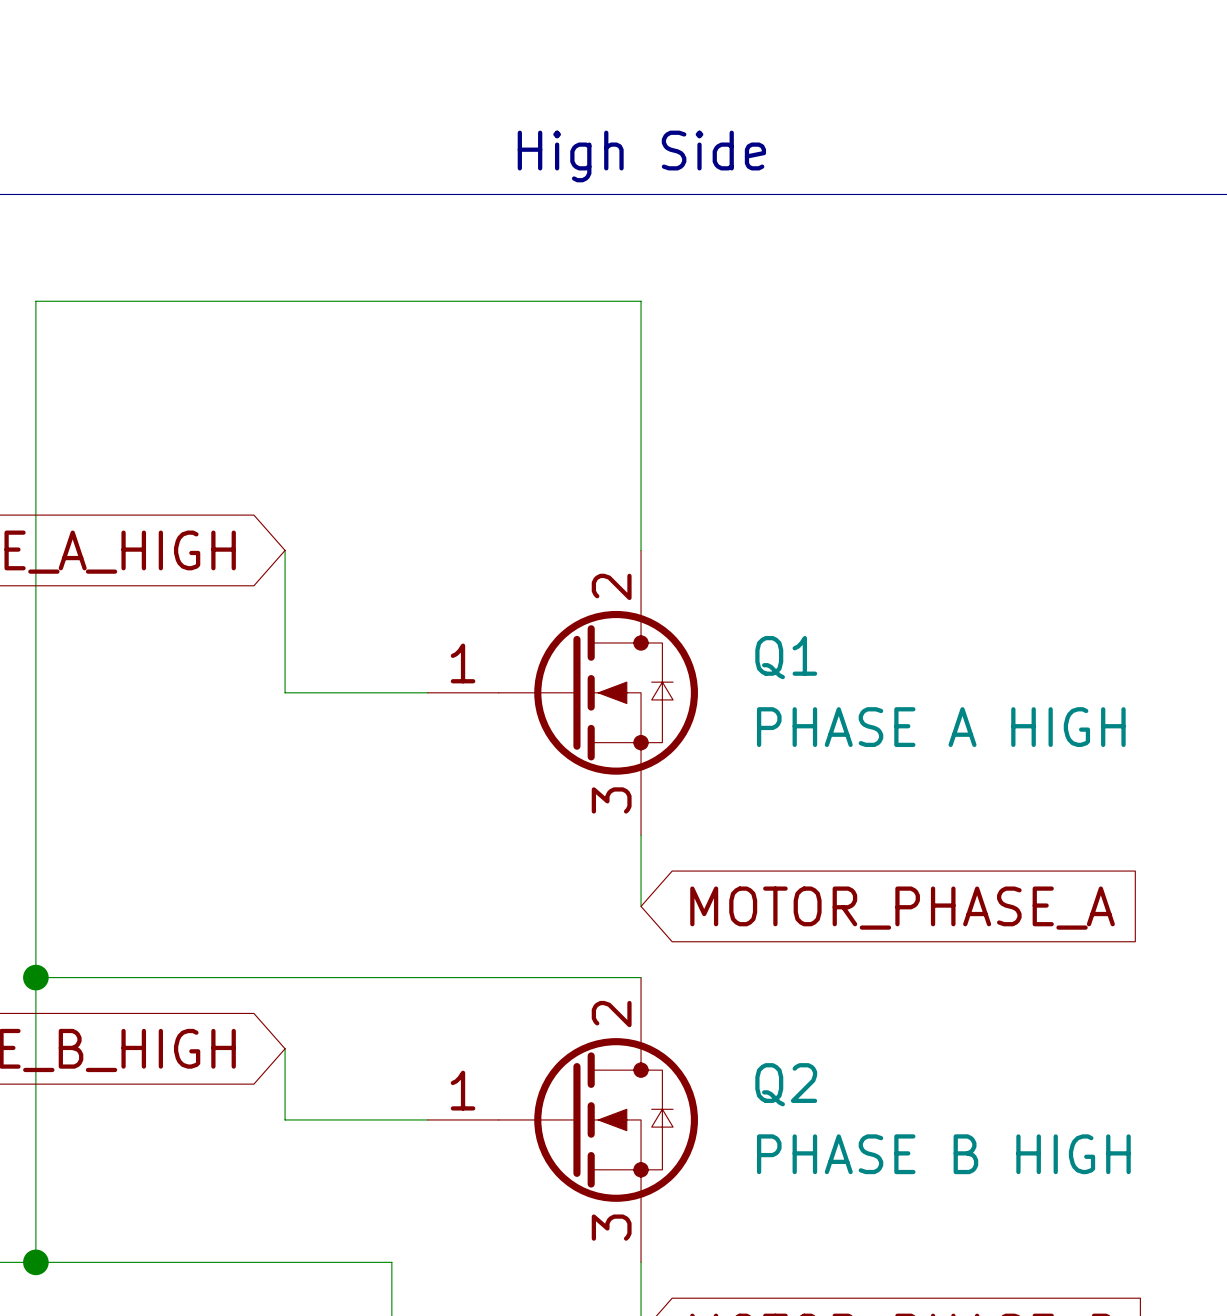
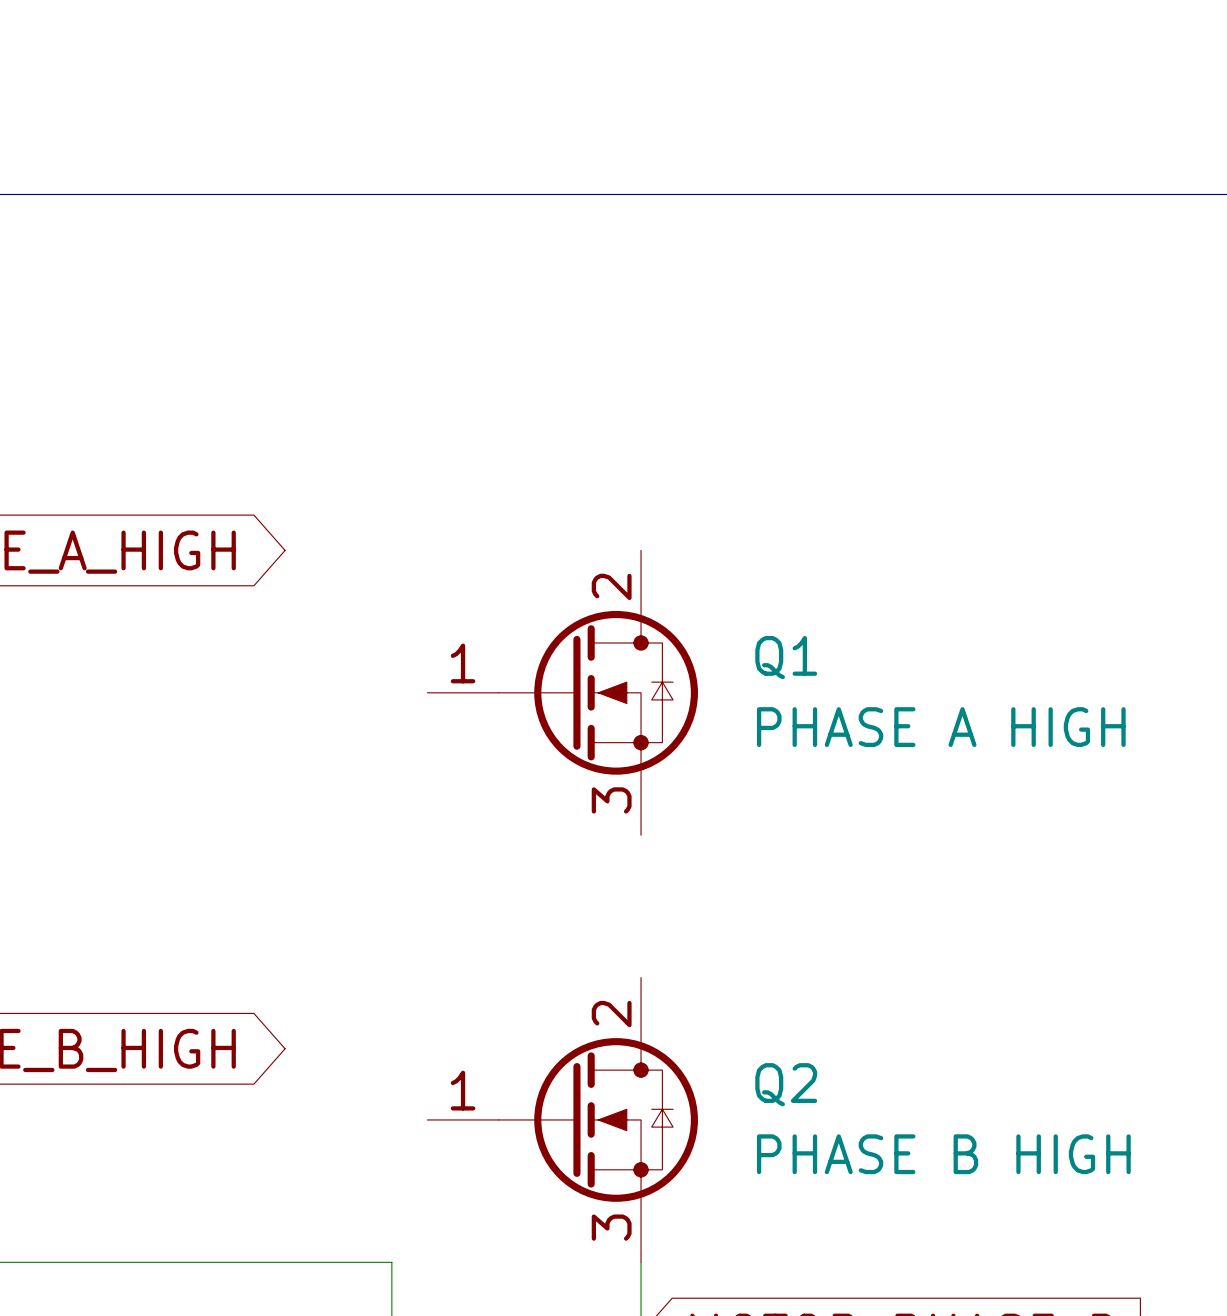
text: High Side (641, 156) -> none
wire: (285, 550) (285, 692) (427, 692) -> none
wire: (641, 550) (641, 301) (35, 301) (35, 1262) -> none
wire: (641, 835) (641, 906) -> none
global label: MOTOR_PHASE_A (902, 908) -> none
wire: (35, 977) (641, 977) -> none
junction: (35, 977) -> none
wire: (285, 1048) (285, 1119) (427, 1119) -> none
junction: (35, 1262) -> none

